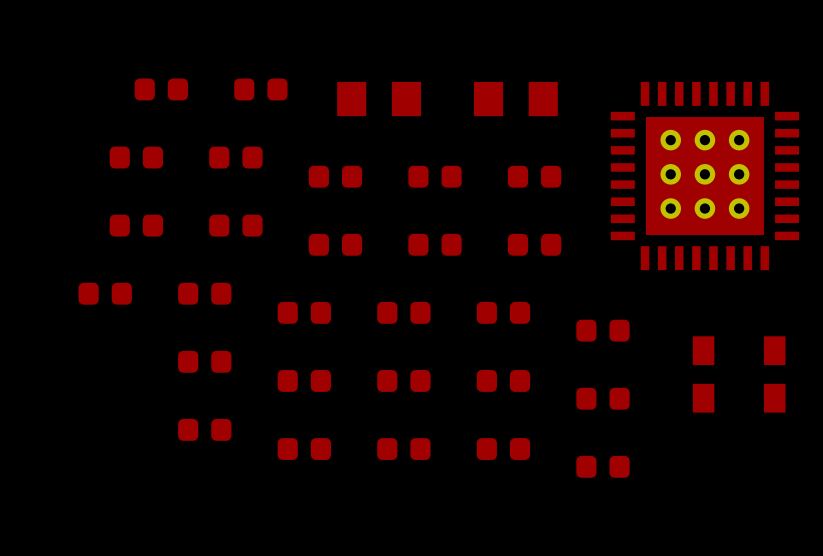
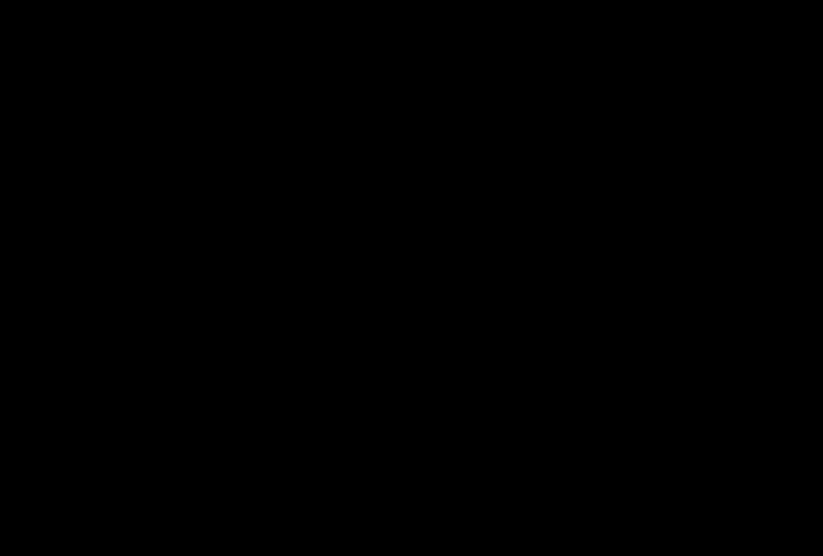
part: (161, 89) -> none
part: (260, 89) -> none
part: (379, 99) -> none
part: (515, 99) -> none
part: (136, 157) -> none
part: (235, 157) -> none
part: (335, 176) -> none
part: (435, 176) -> none
part: (534, 176) -> none
part: (704, 176) -> none
part: (136, 225) -> none
part: (235, 225) -> none
part: (335, 244) -> none
part: (435, 244) -> none
part: (534, 244) -> none
part: (105, 293) -> none
part: (204, 293) -> none
part: (304, 312) -> none
part: (403, 312) -> none
part: (503, 312) -> none
part: (602, 330) -> none
part: (204, 361) -> none
part: (739, 374) -> none
part: (304, 380) -> none
part: (403, 380) -> none
part: (503, 380) -> none
part: (602, 398) -> none
part: (204, 429) -> none
part: (304, 449) -> none
part: (403, 449) -> none
part: (503, 449) -> none
part: (602, 466) -> none

